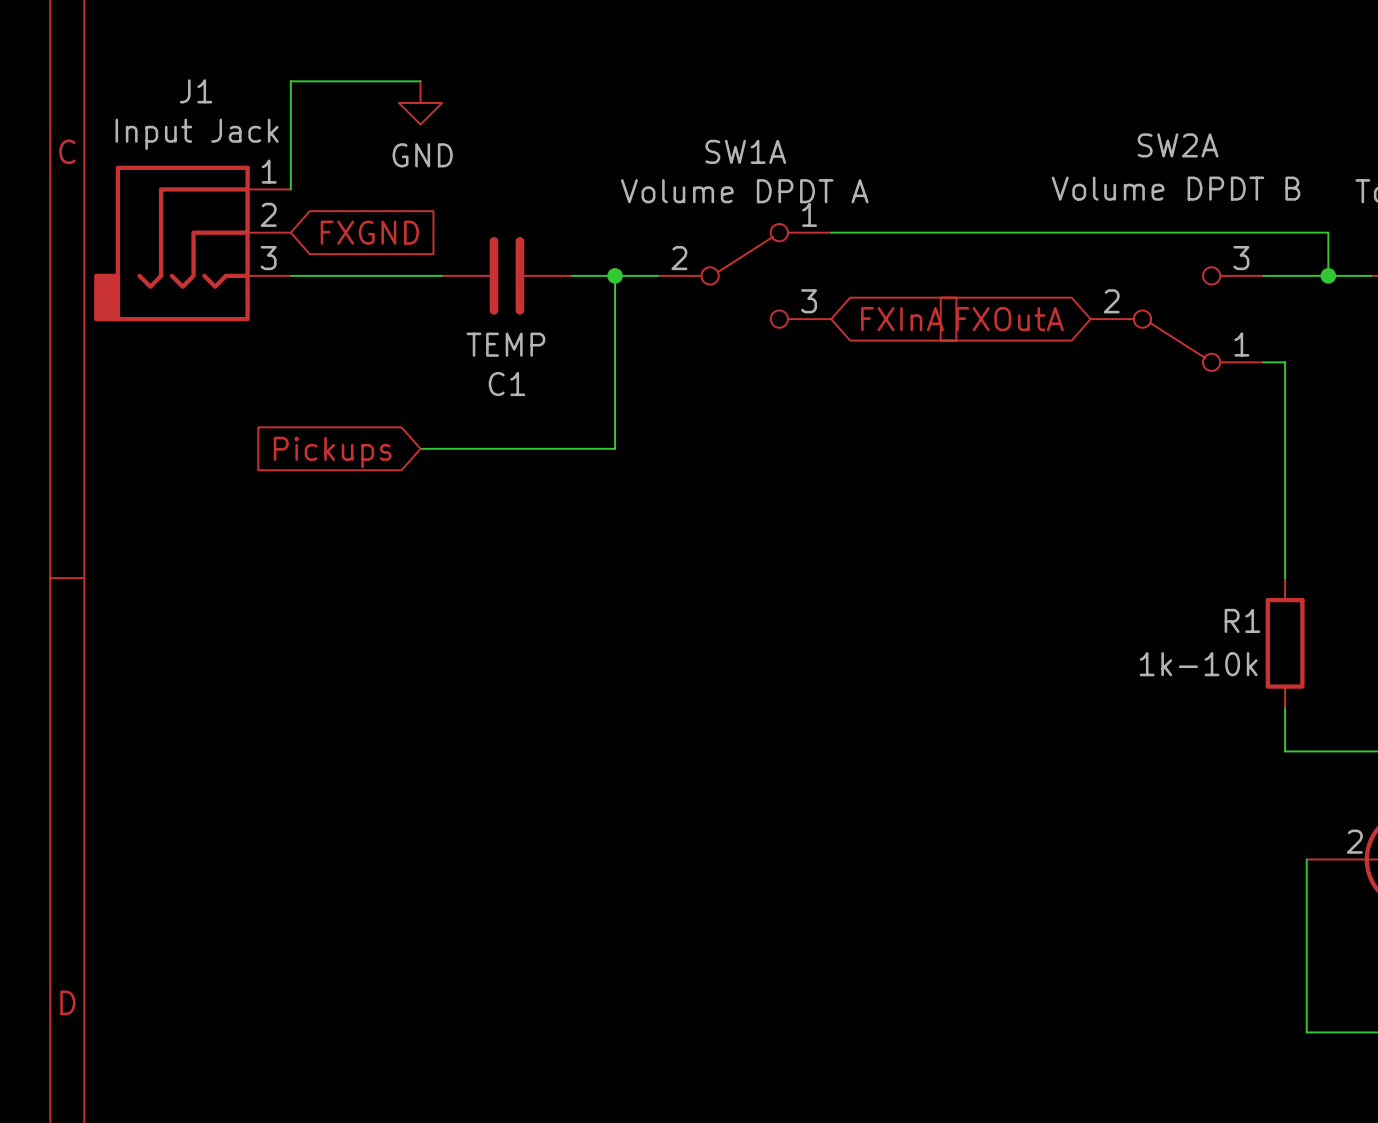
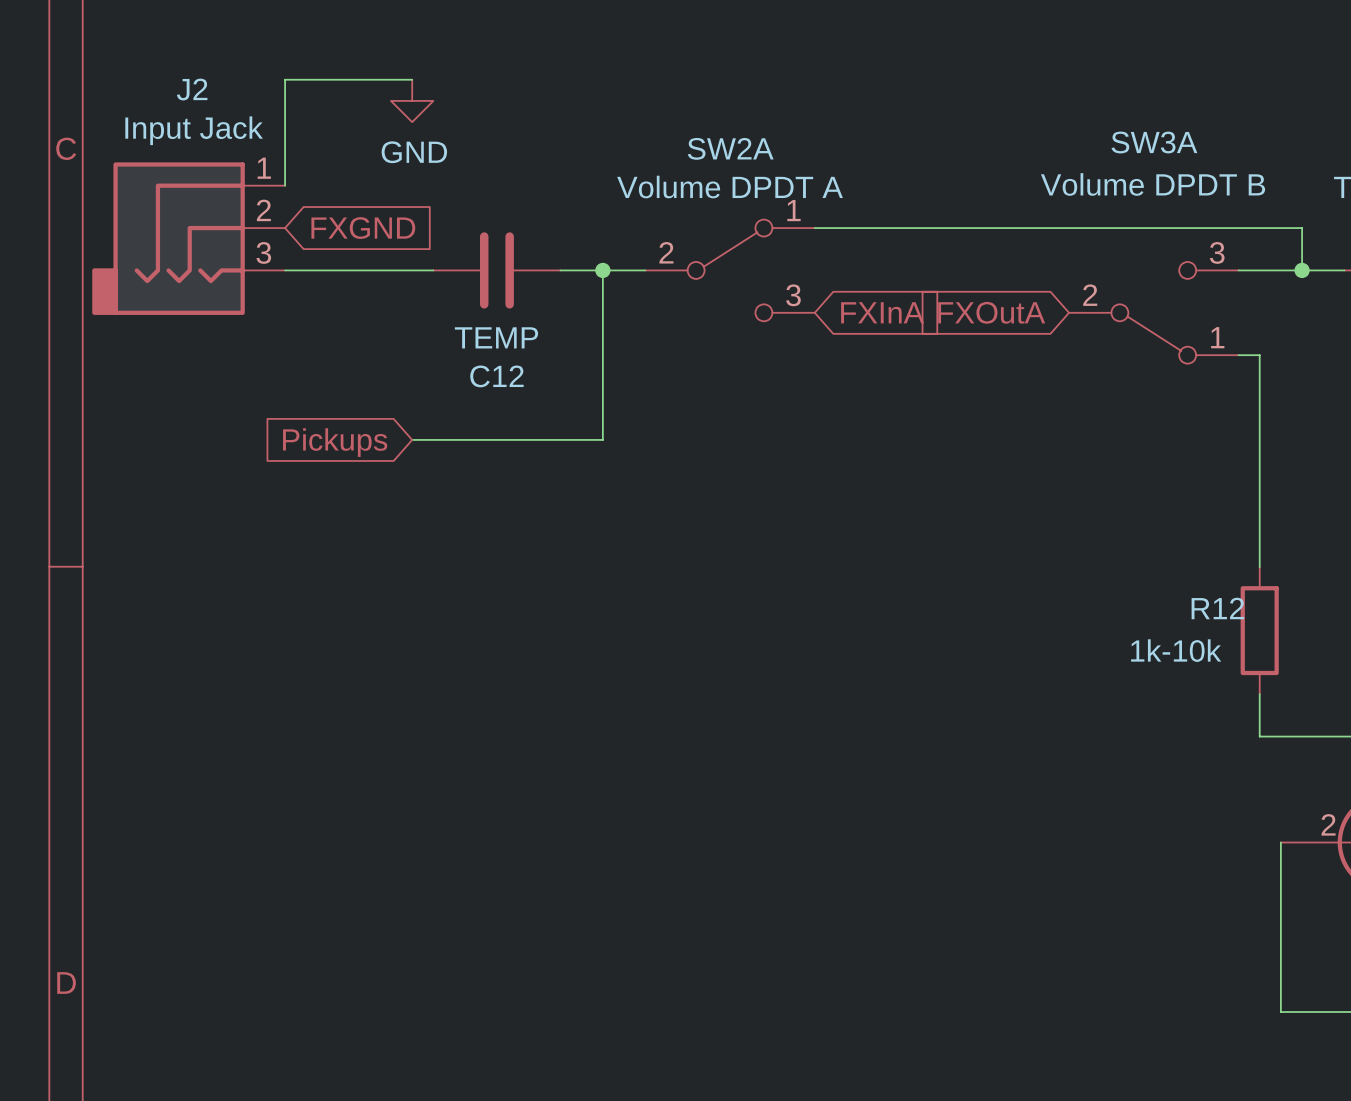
J1 name: J1 (196, 91) -> J2 (192, 89)
SW2A name: SW2A (1178, 145) -> SW3A (1154, 142)
SW1A name: SW1A (745, 151) -> SW2A (730, 148)
C1 name: C1 (506, 384) -> C12 (496, 376)
R1 name: R1 (1242, 620) -> R12 (1217, 608)

